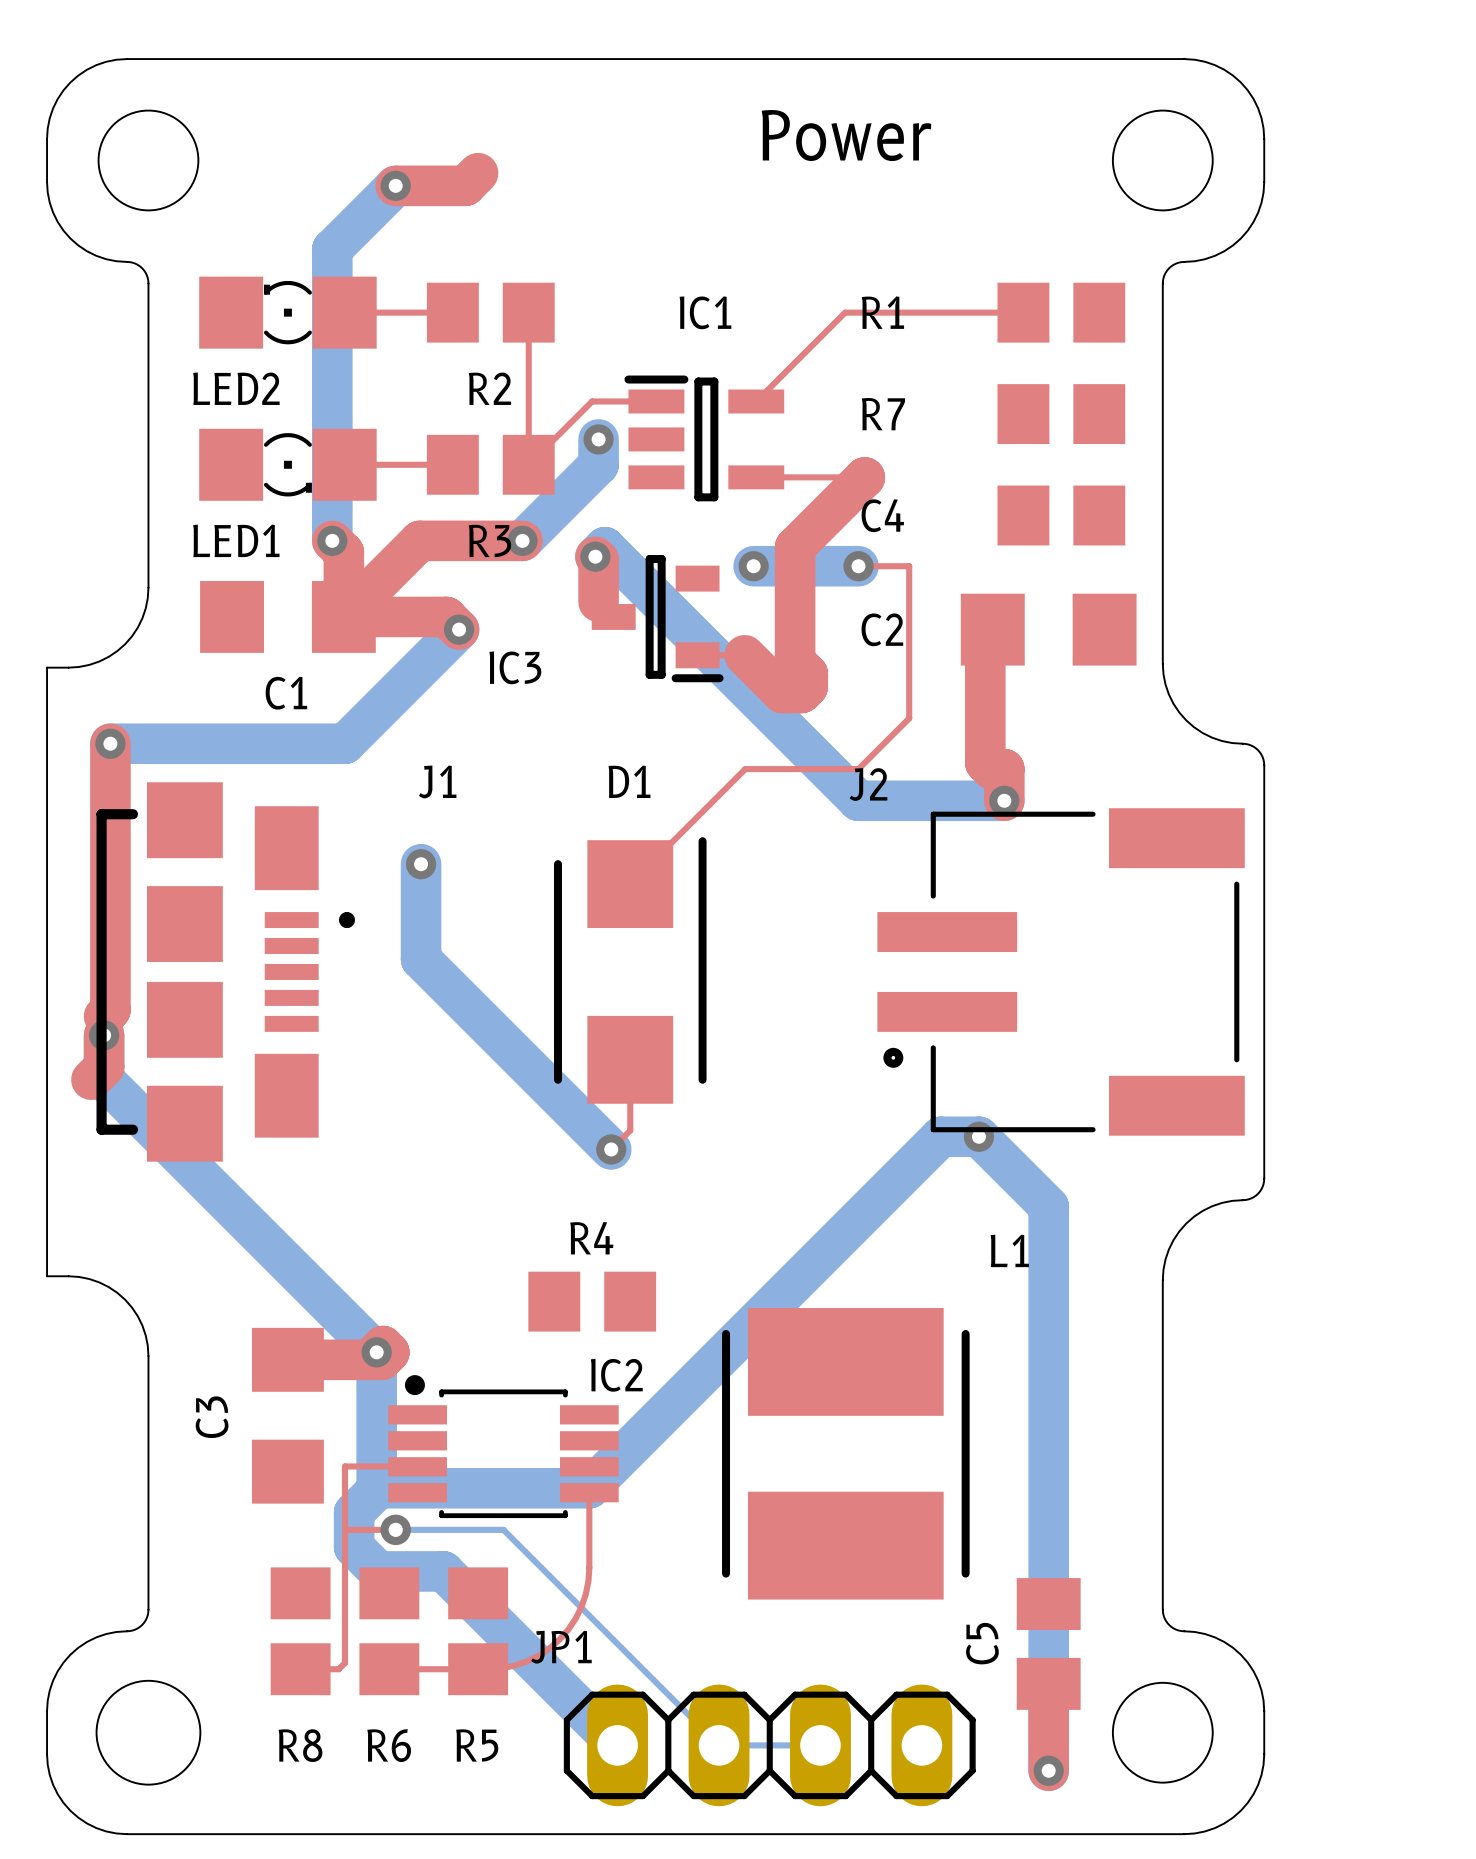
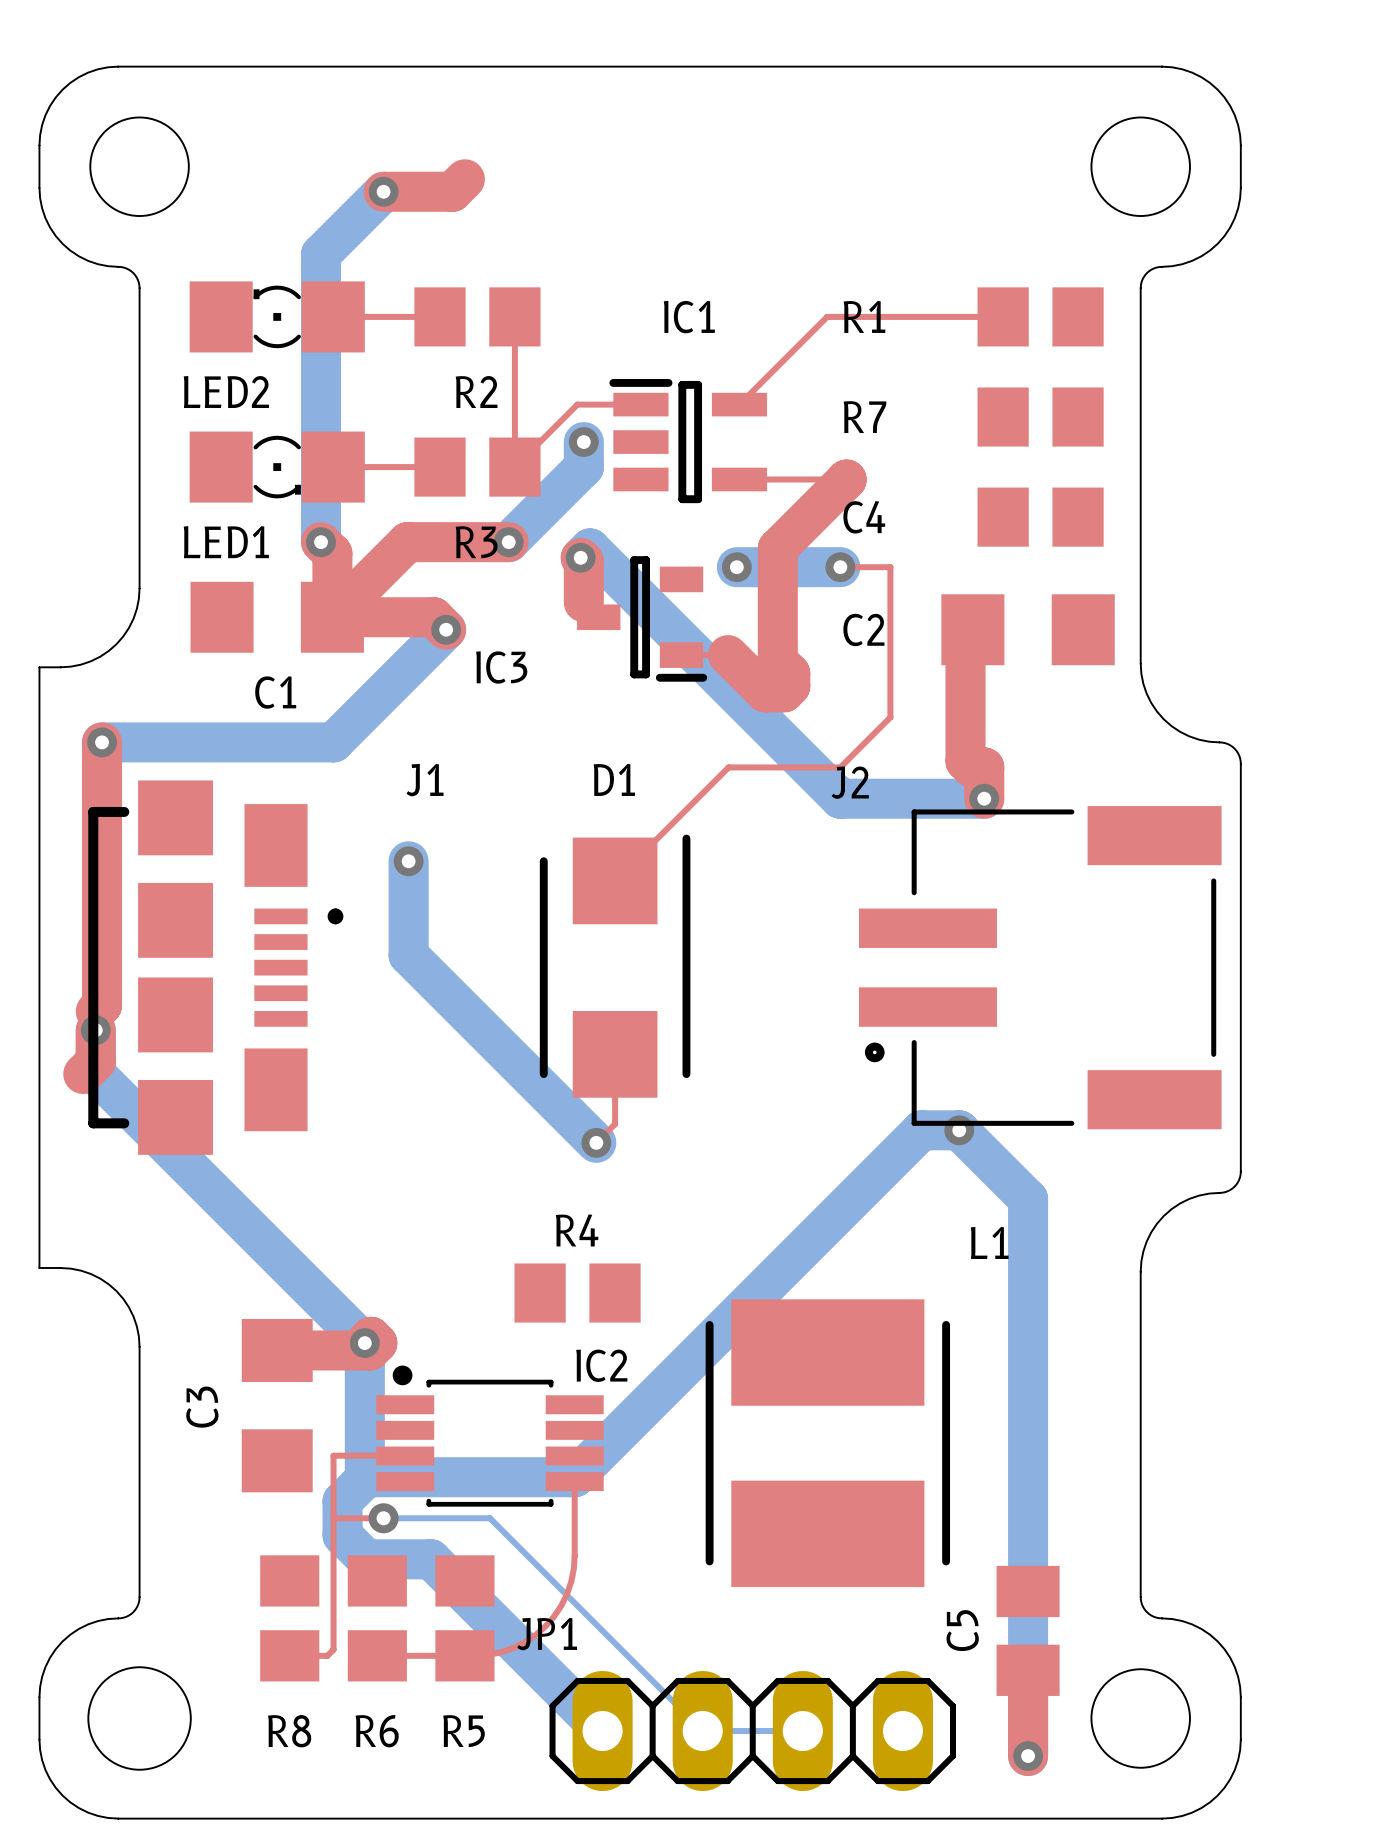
text: Power (846, 135) -> none

